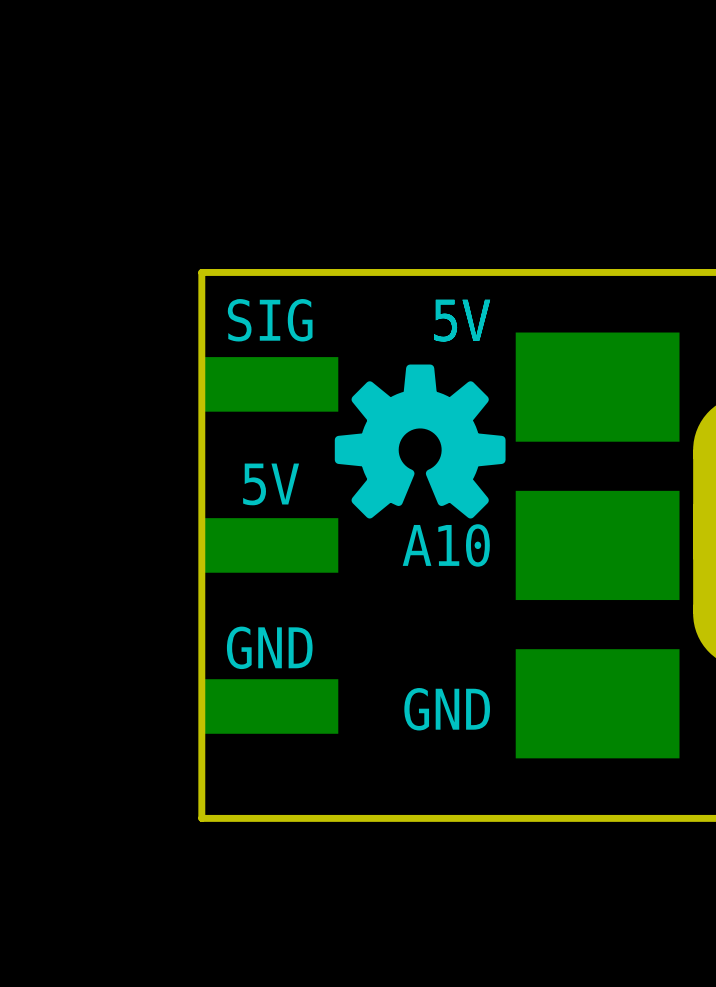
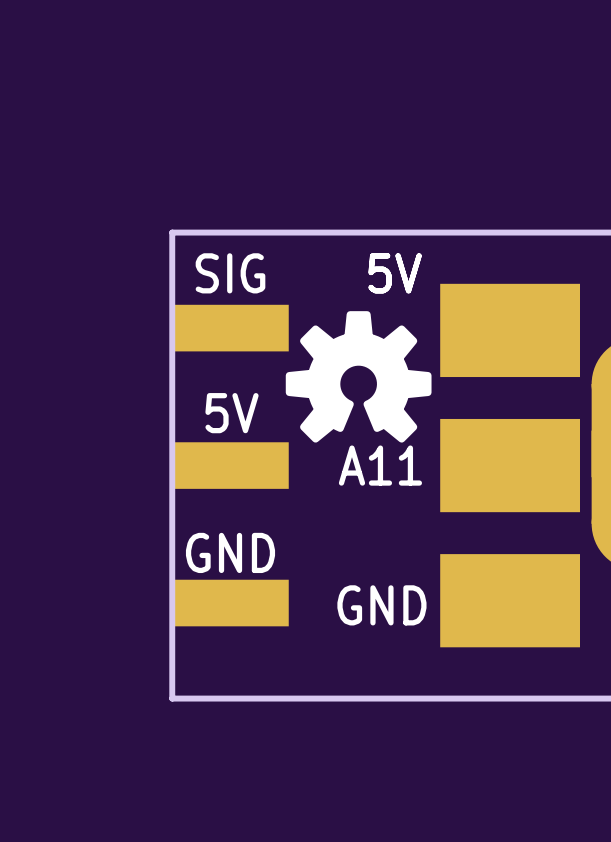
text: A10 (446, 545) -> A11 (380, 465)

